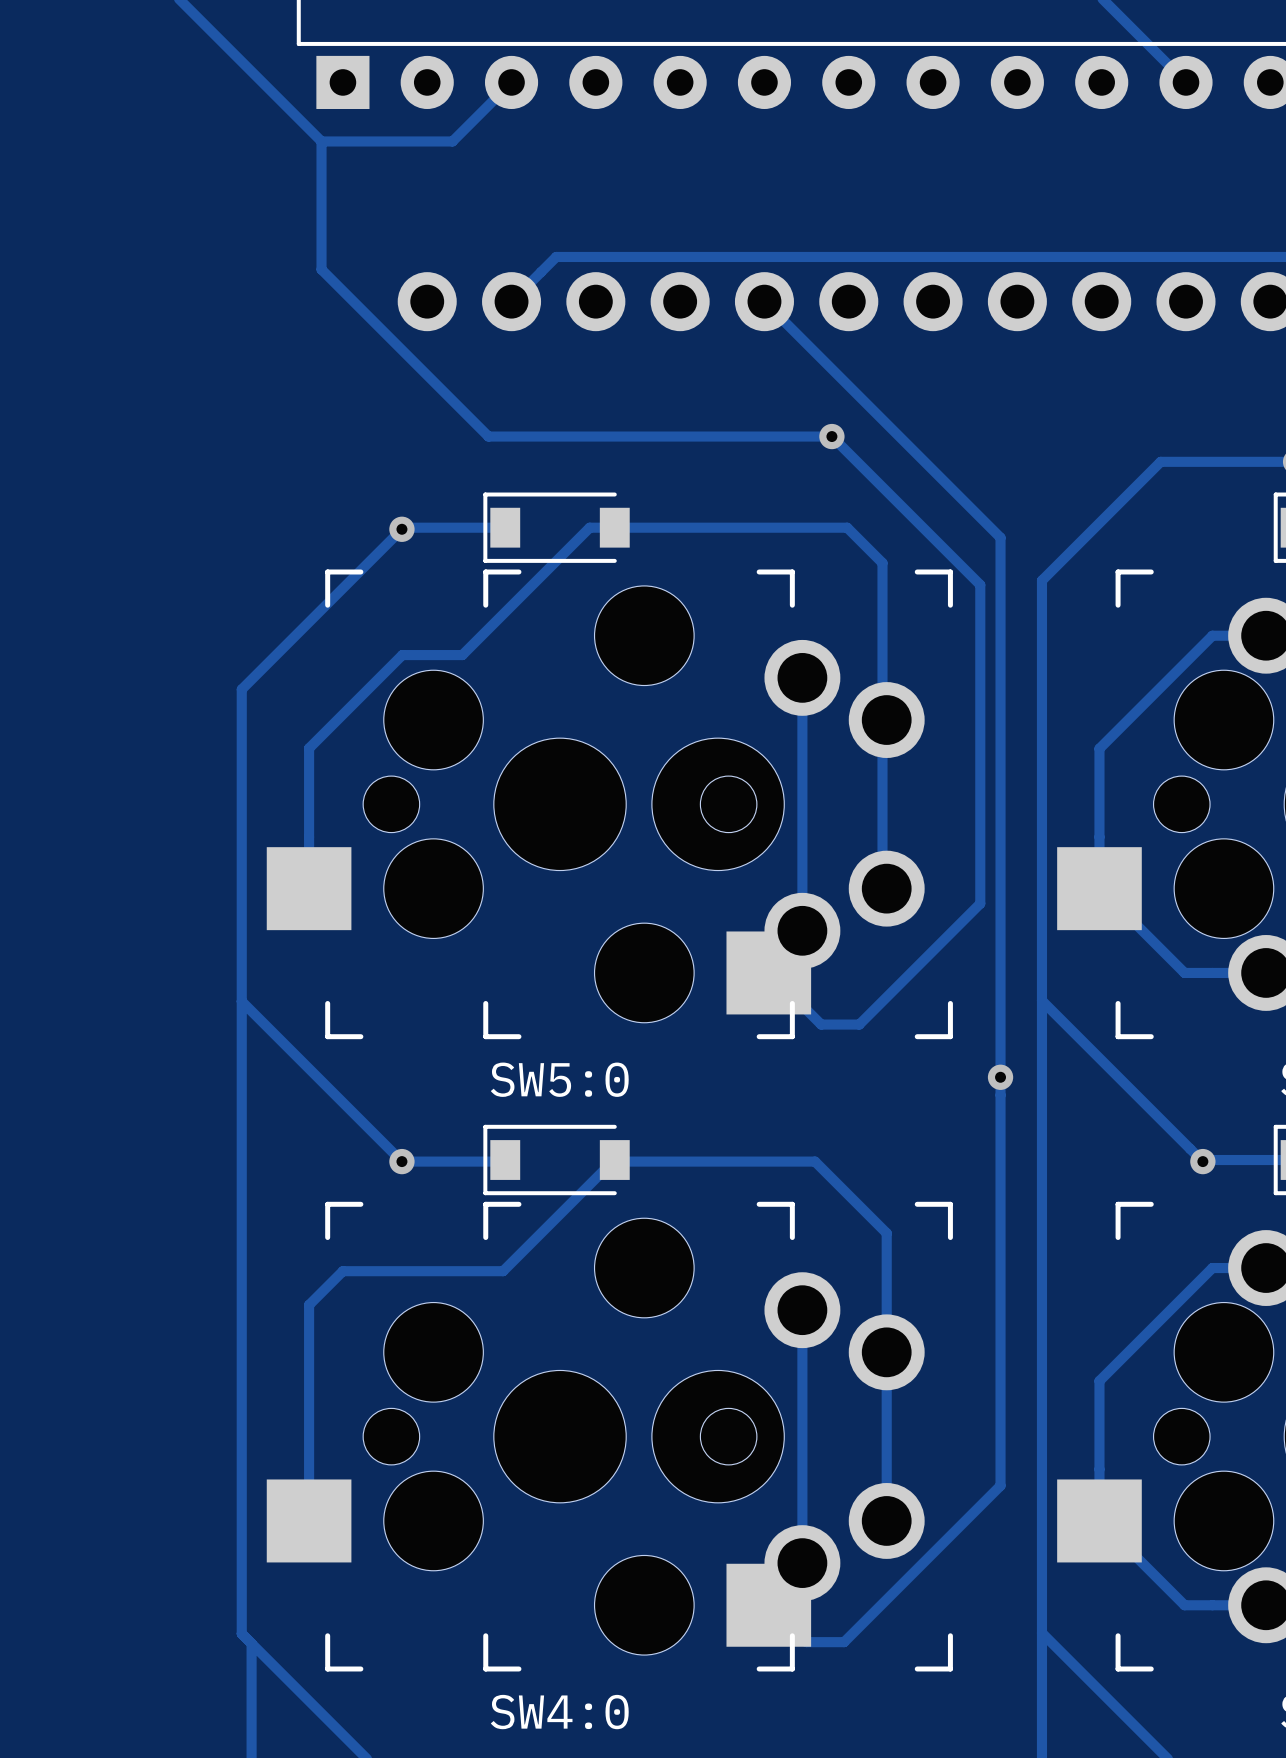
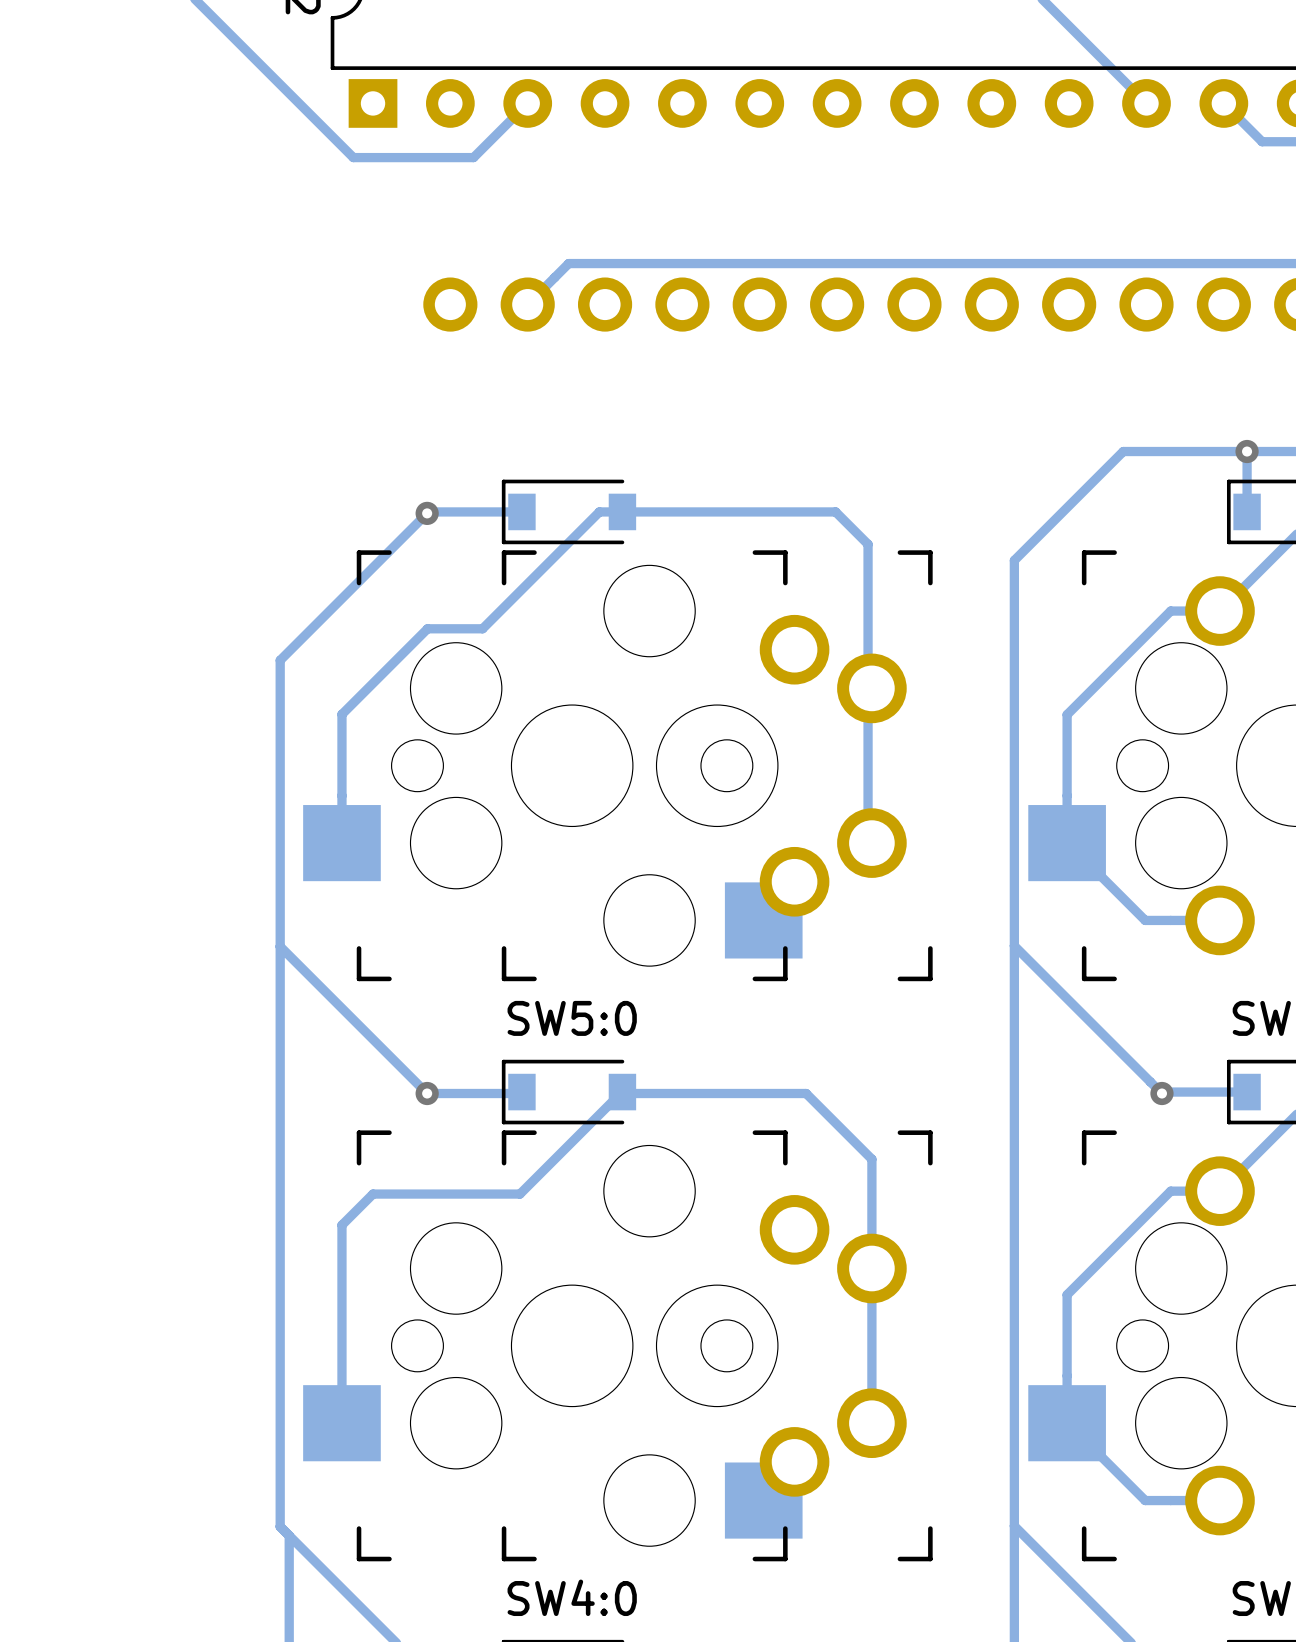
track: (321, 141) (321, 269) (488, 436) (831, 436) (980, 584) (980, 903) (859, 1024) (821, 1024) (768, 972) -> none
track: (764, 301) (1000, 537) (1000, 1485) (844, 1642) (806, 1642) (768, 1605) -> none
via: (831, 436) -> none
track: (802, 677) (802, 916) -> none
via: (1000, 1077) -> none
track: (802, 1310) (802, 1548) -> none

